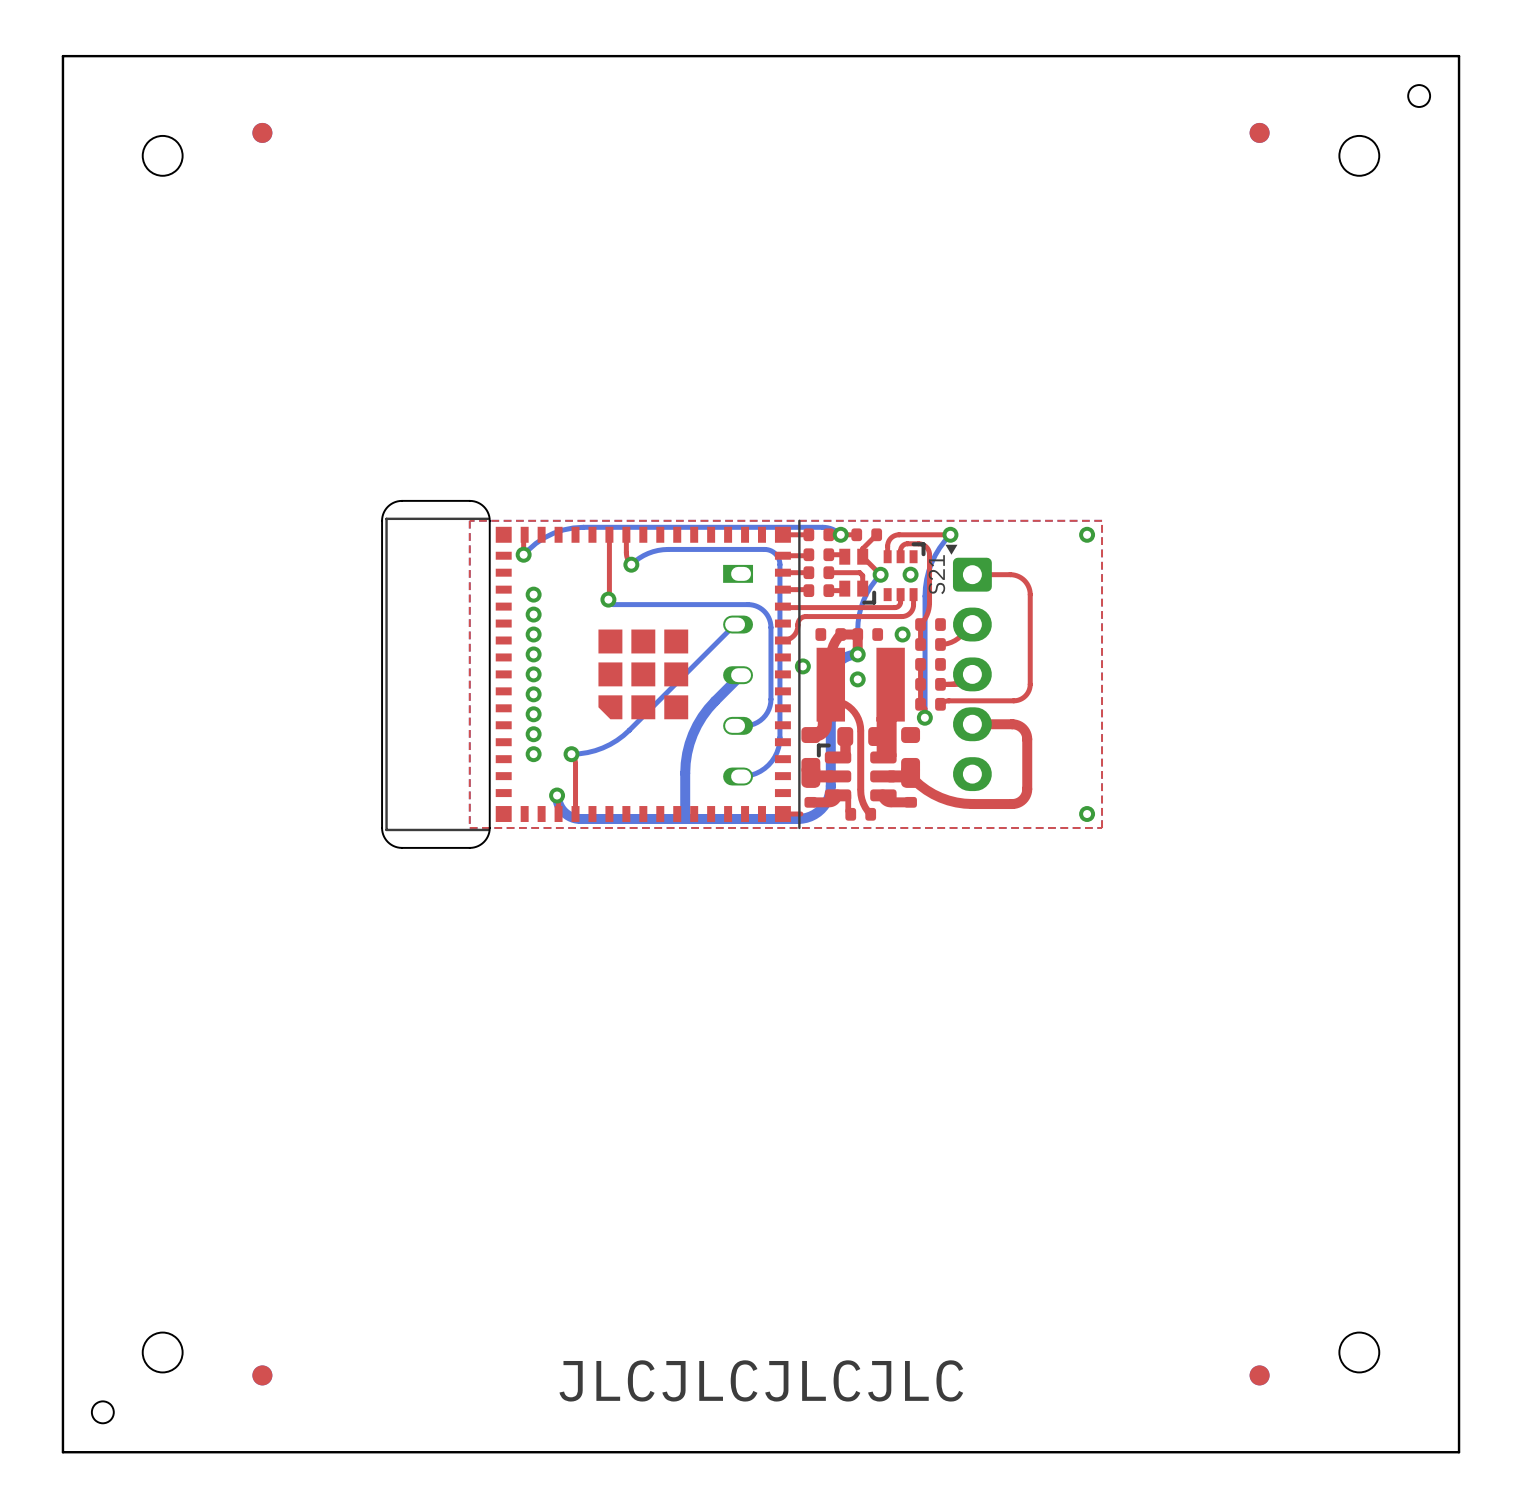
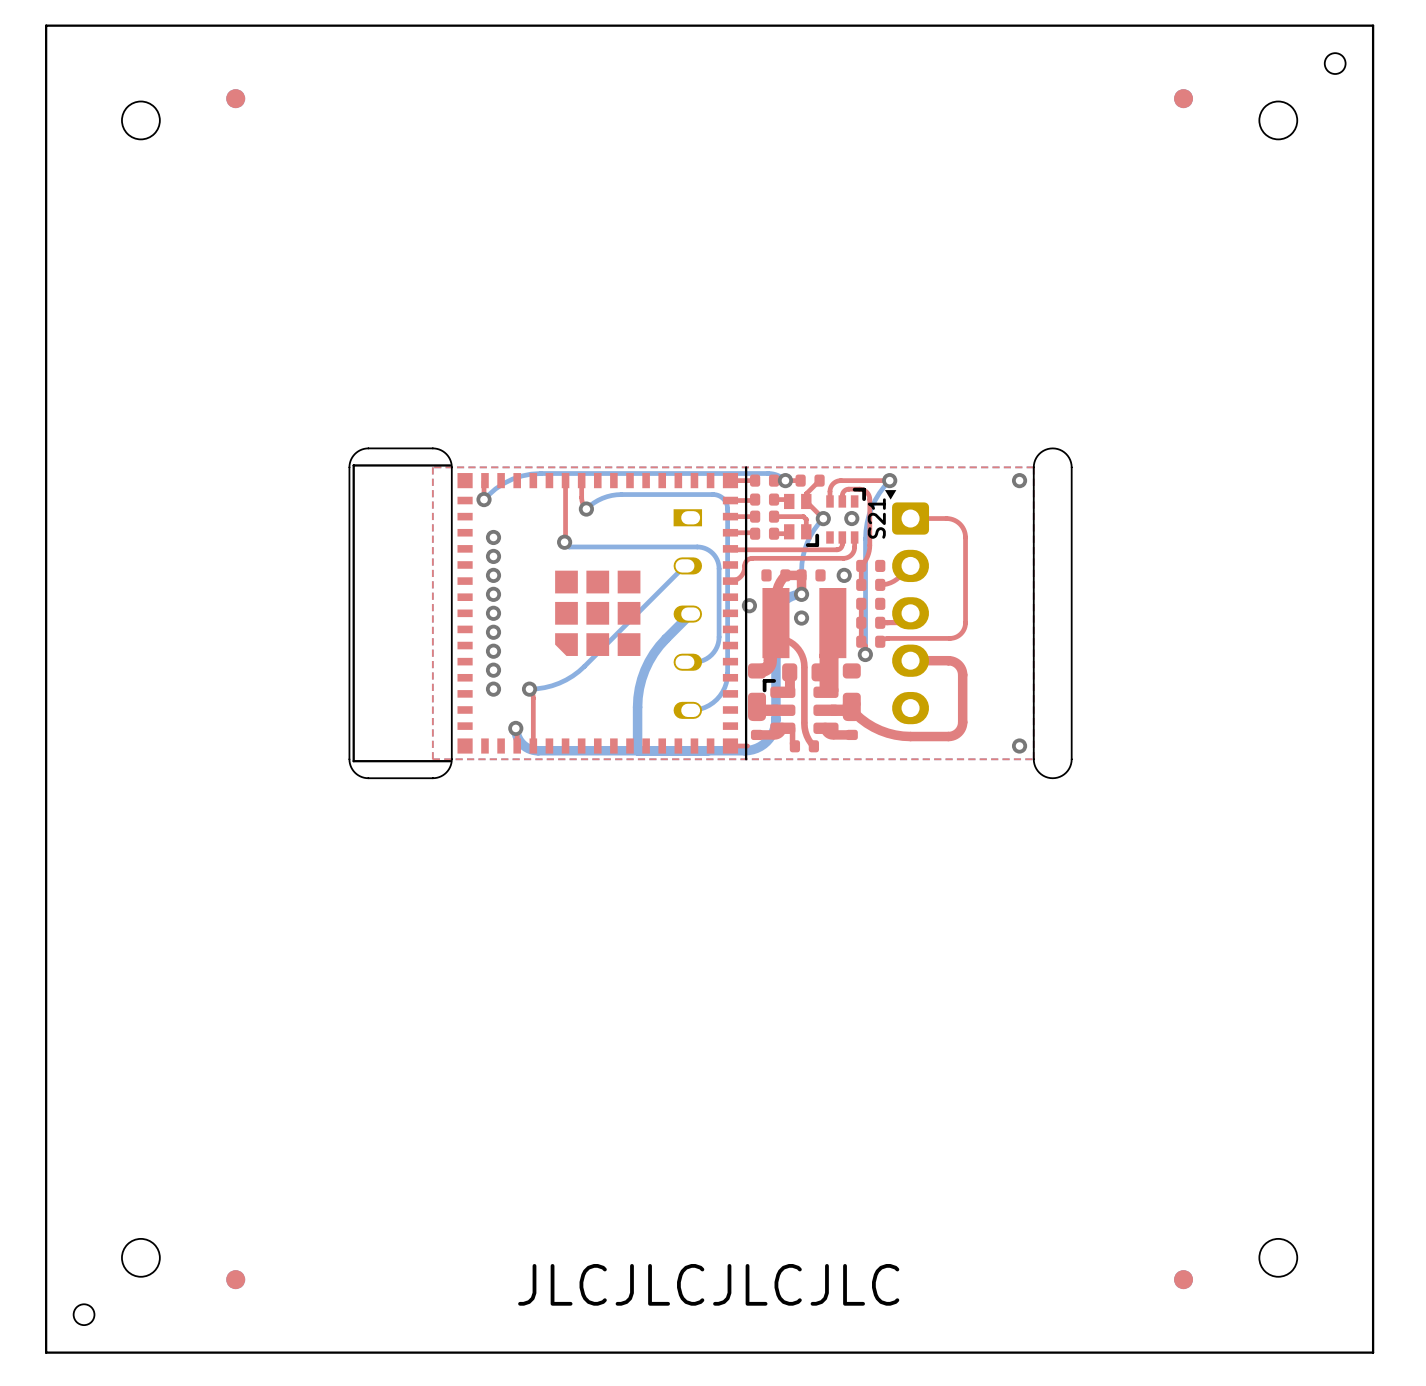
board edge: none -> (1033, 467) (1033, 759) (1039, 772) (1052, 778) (1066, 772) (1071, 759) (1071, 467) (1066, 453) (1052, 448) (1039, 453) (1033, 467)

